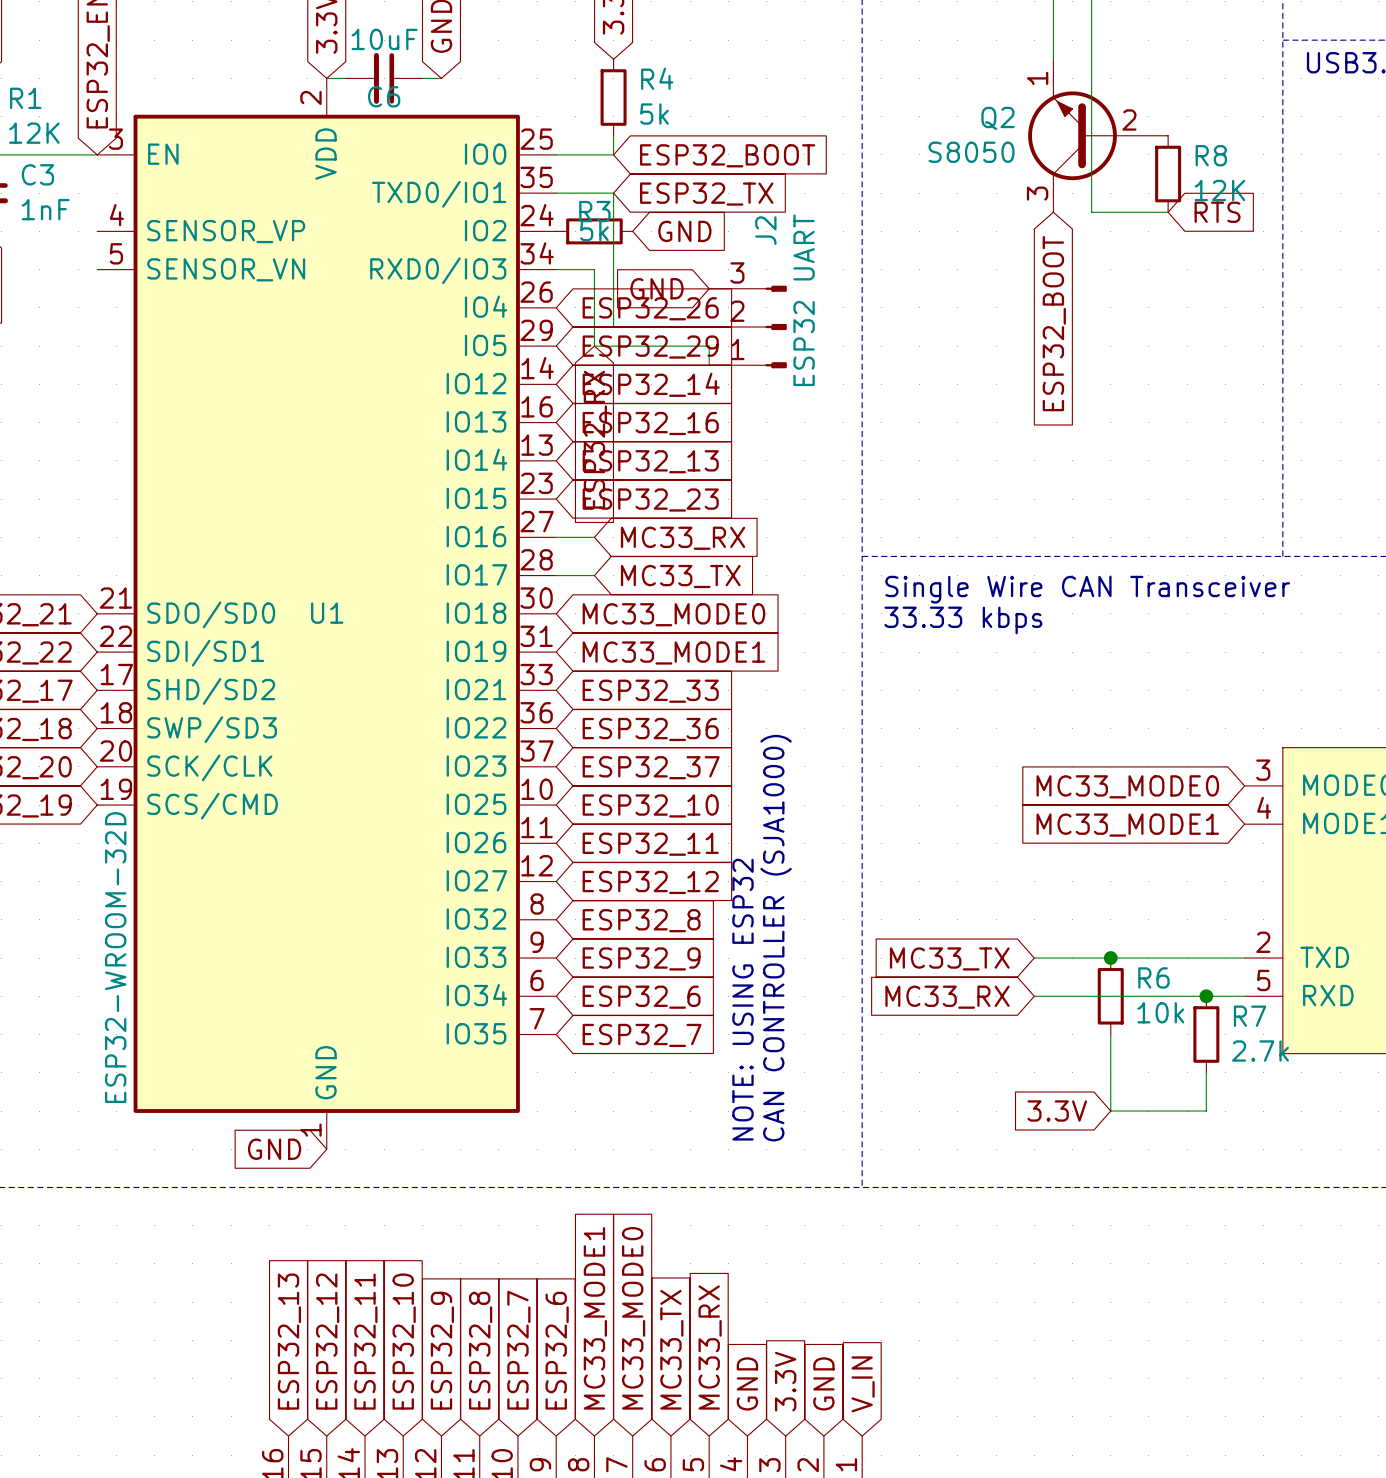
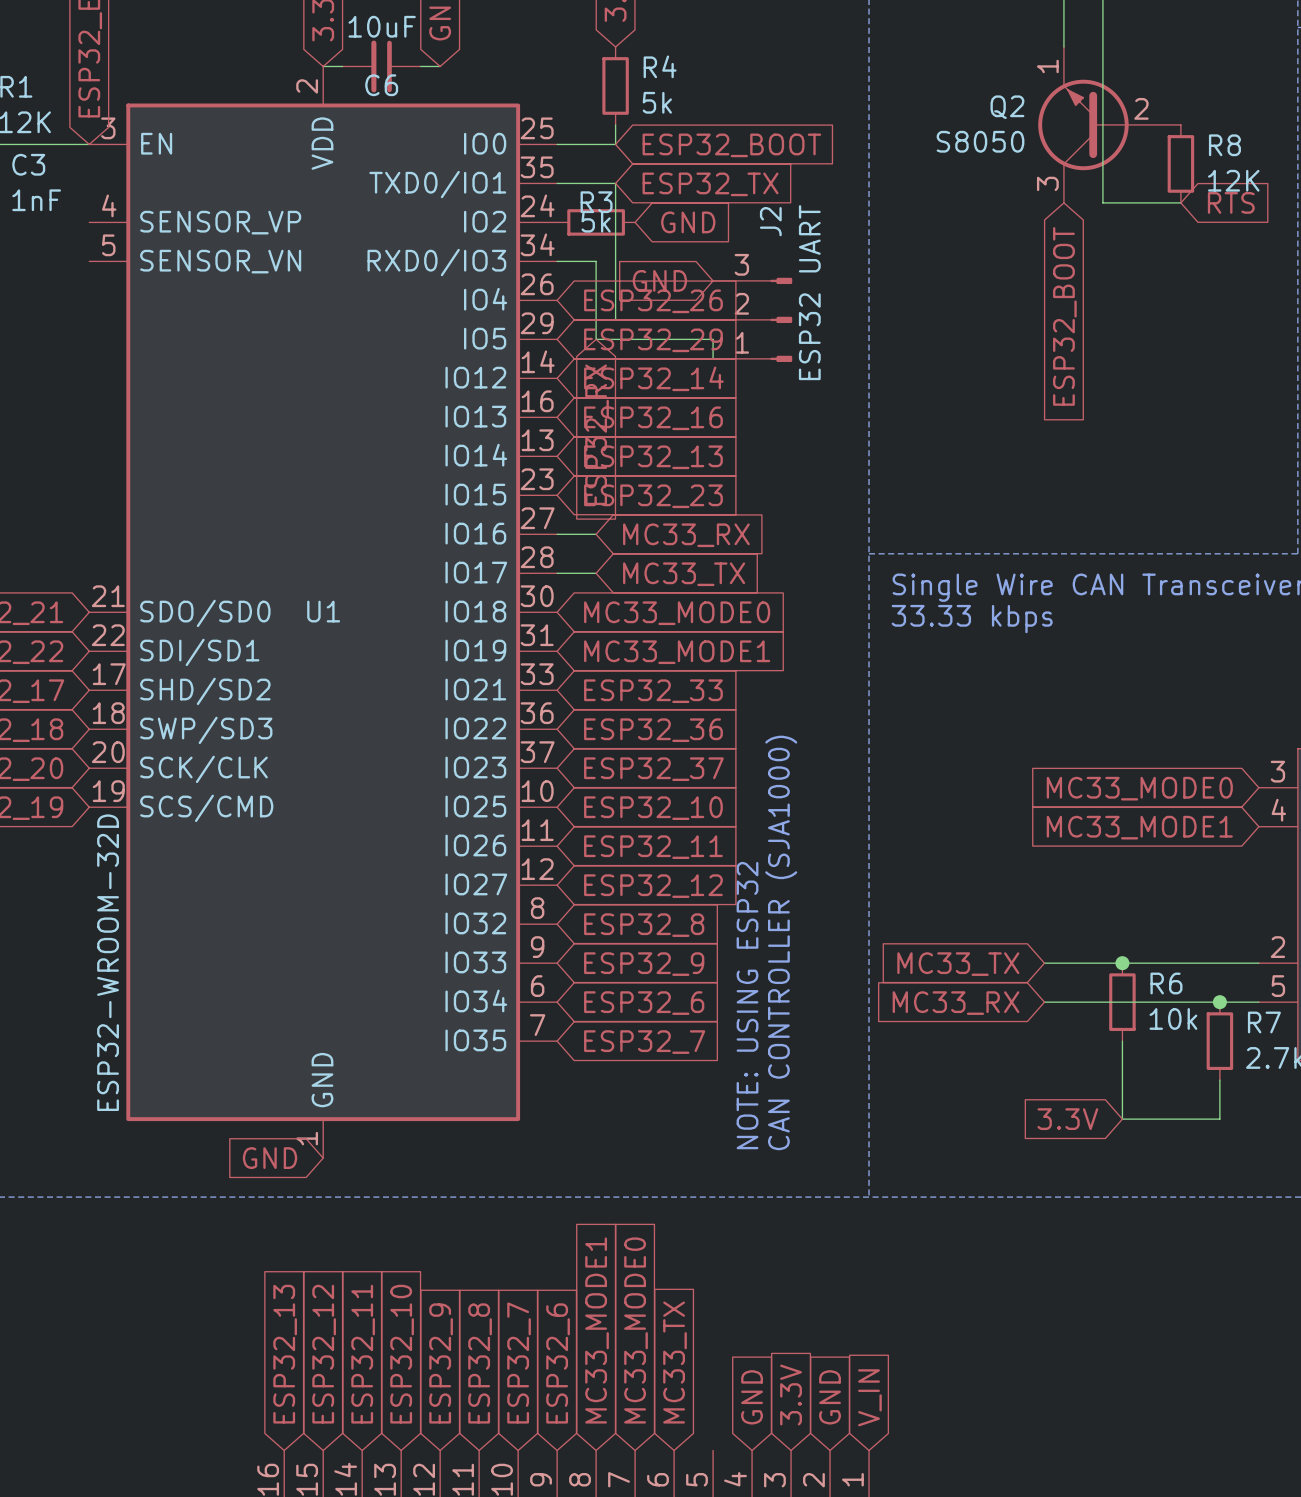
global label: MC33_RX (710, 1347) -> none

